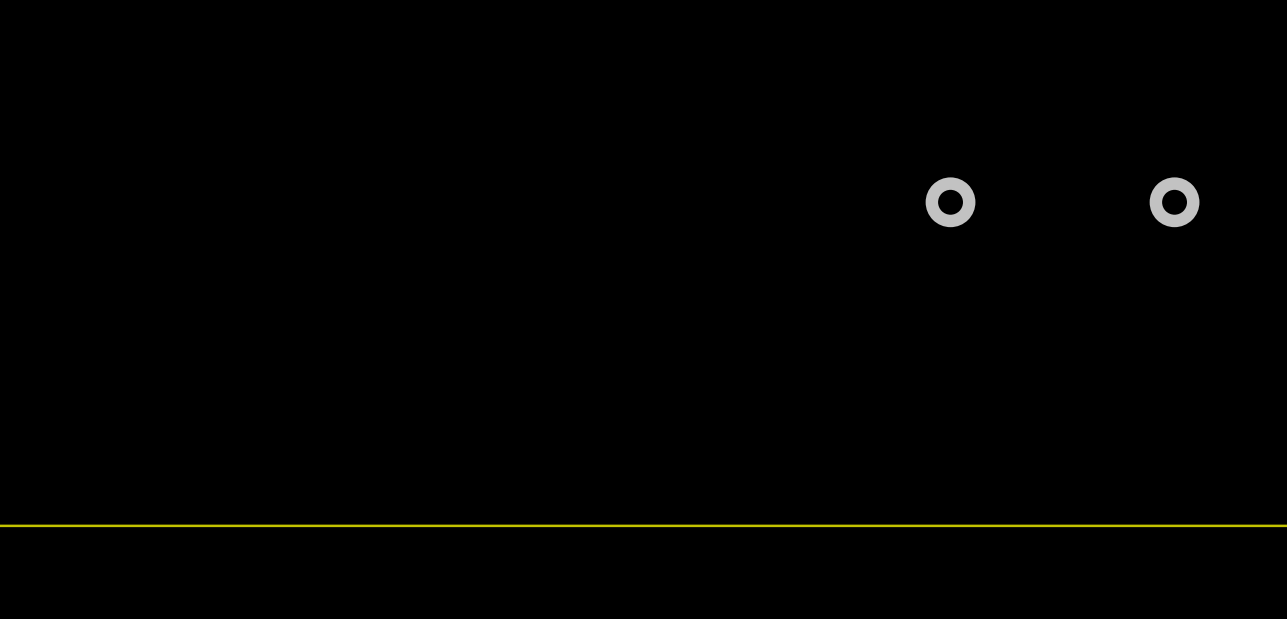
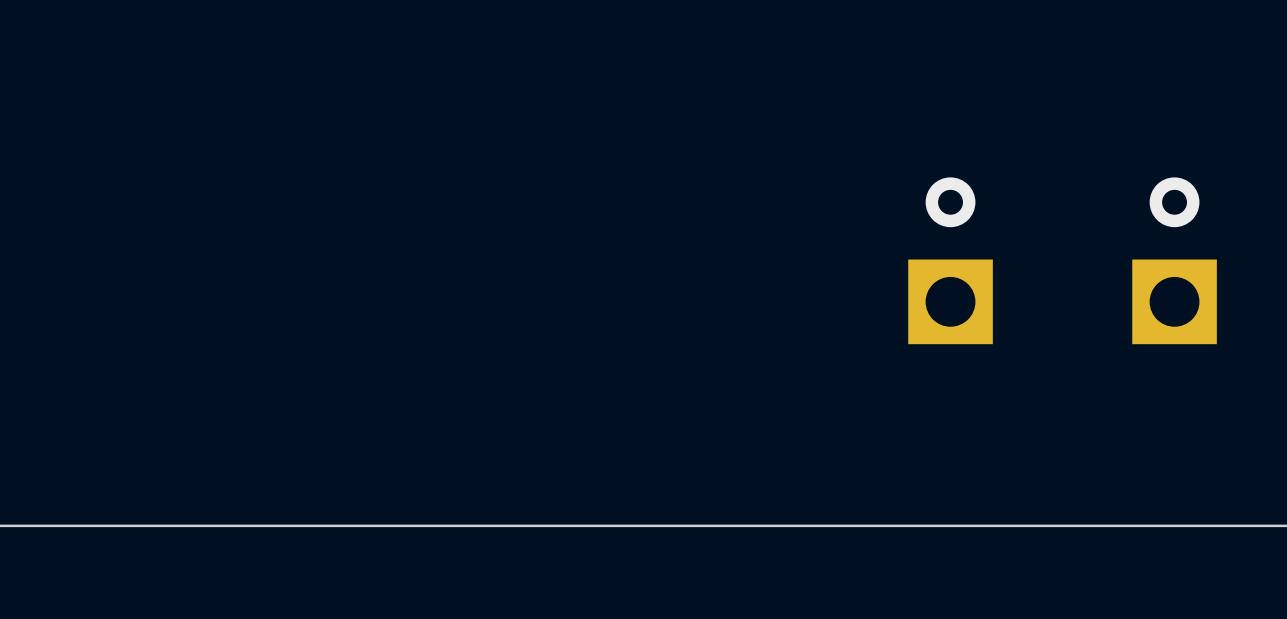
part: none -> (950, 301)
part: none -> (1174, 301)

